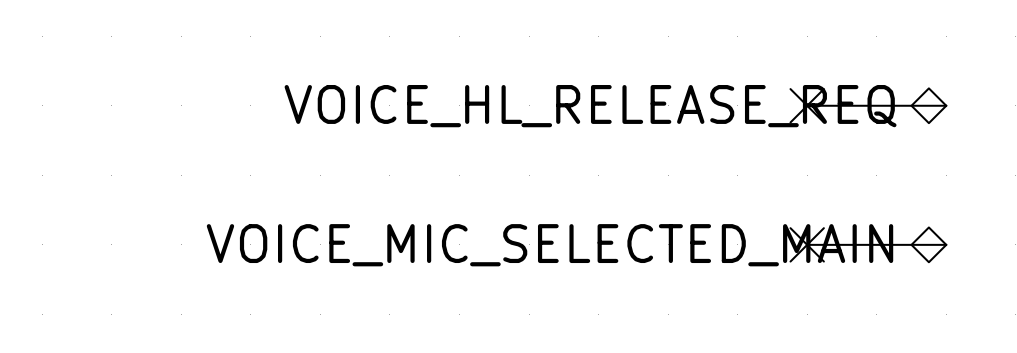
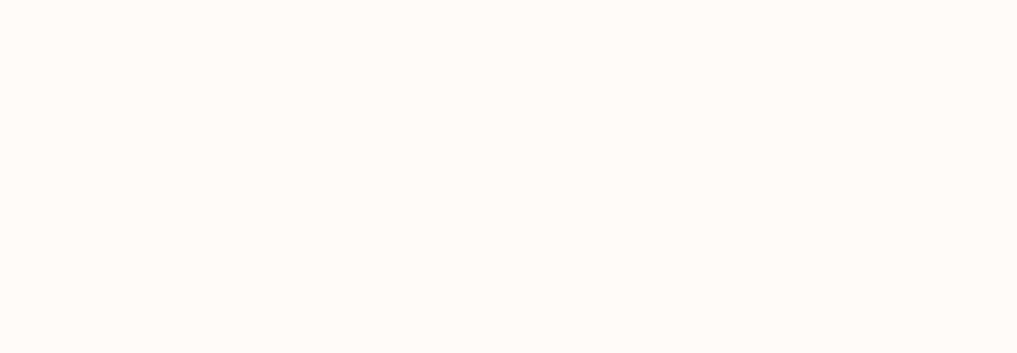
wire: (807, 105) (946, 105) -> none
no-connect mark: (807, 105) -> none
hierarchical label: VOICE_HL_RELEASE_REQ (590, 106) -> none
wire: (807, 244) (946, 244) -> none
no-connect mark: (807, 244) -> none
hierarchical label: VOICE_MIC_SELECTED_MAIN (549, 245) -> none

